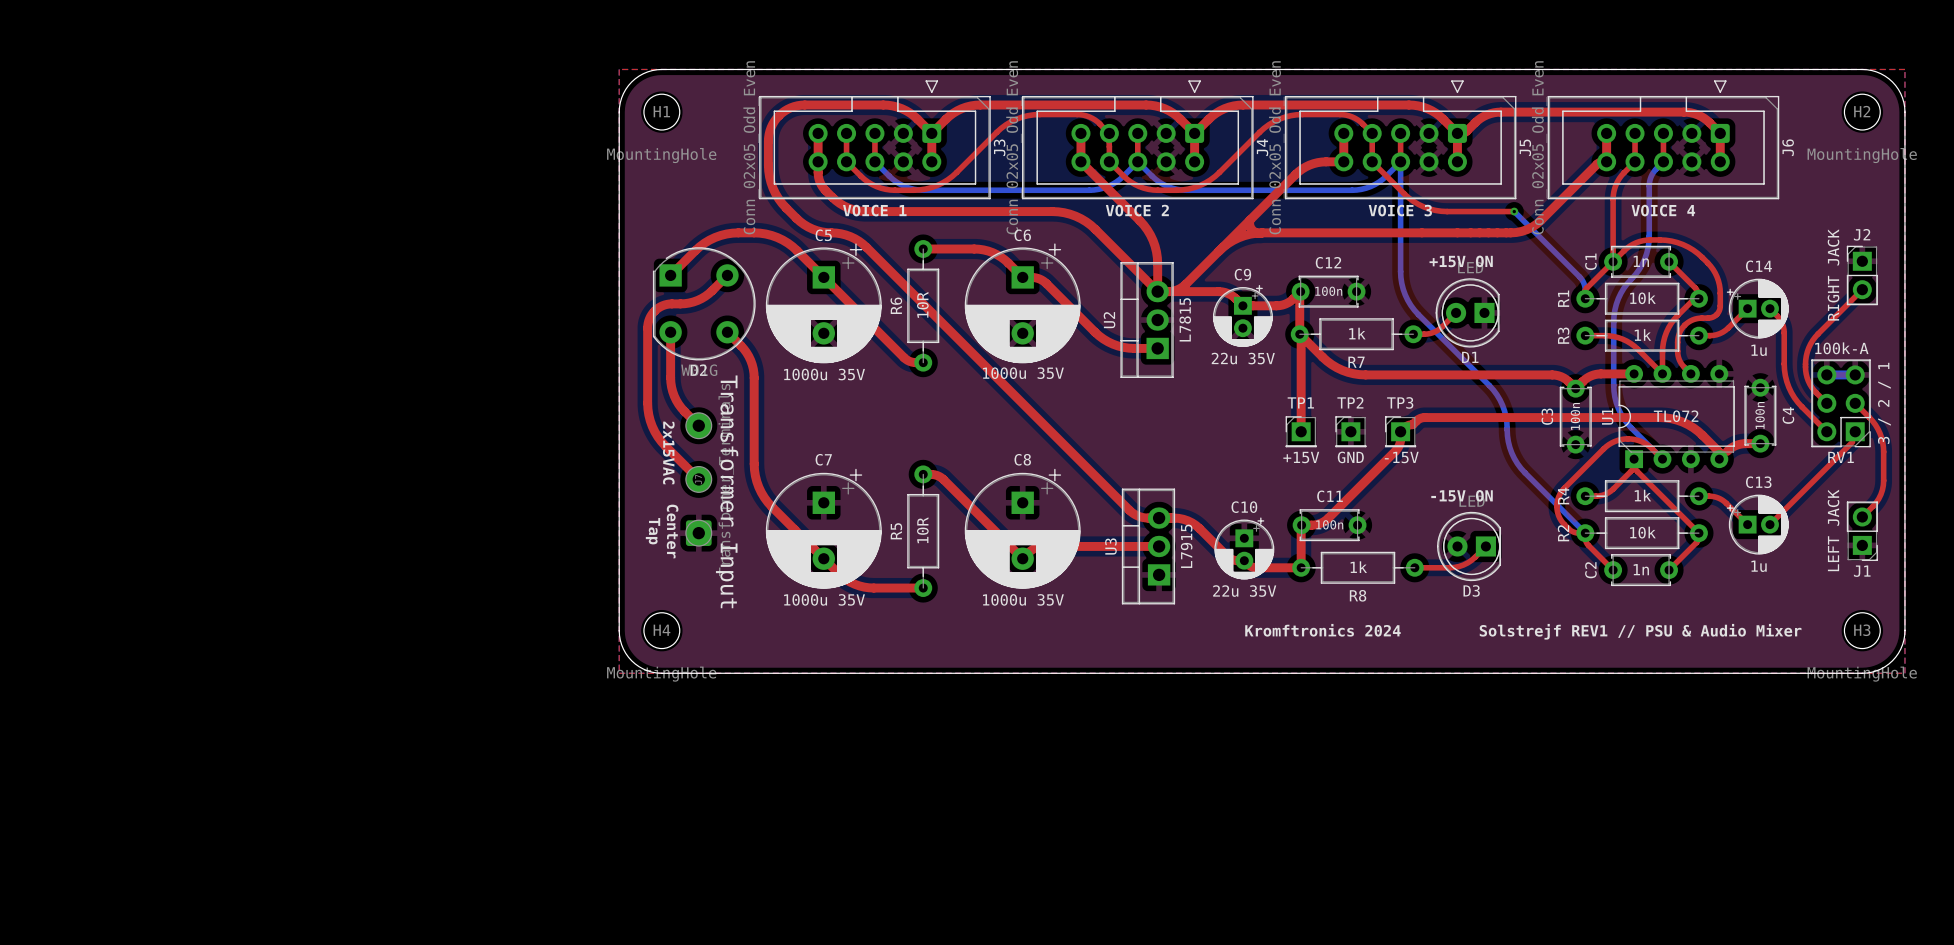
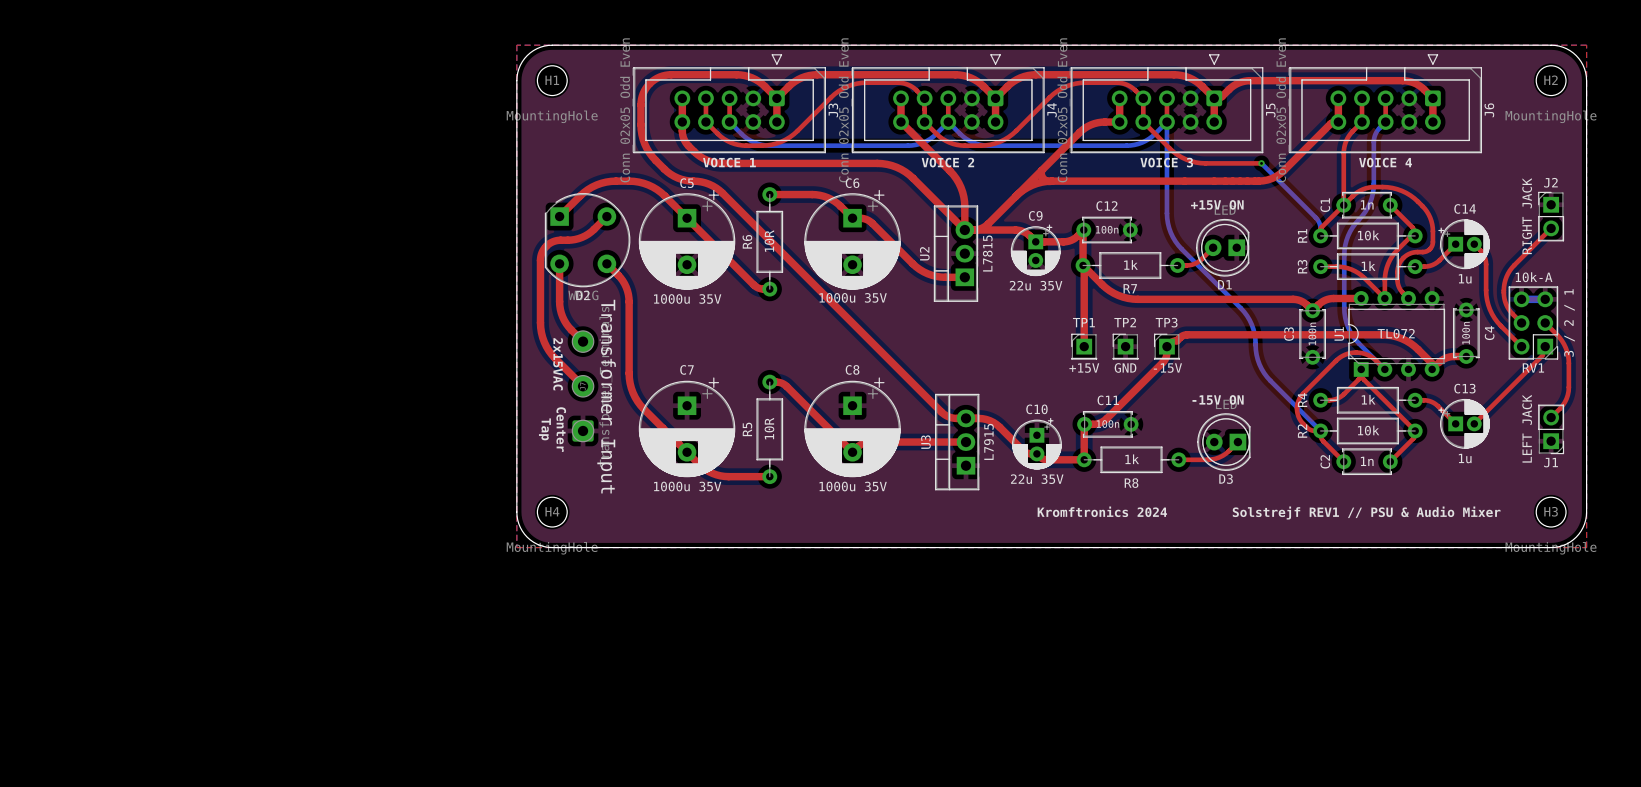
RV1 value: 100k-A (1841, 348) -> 10k-A (1534, 277)

